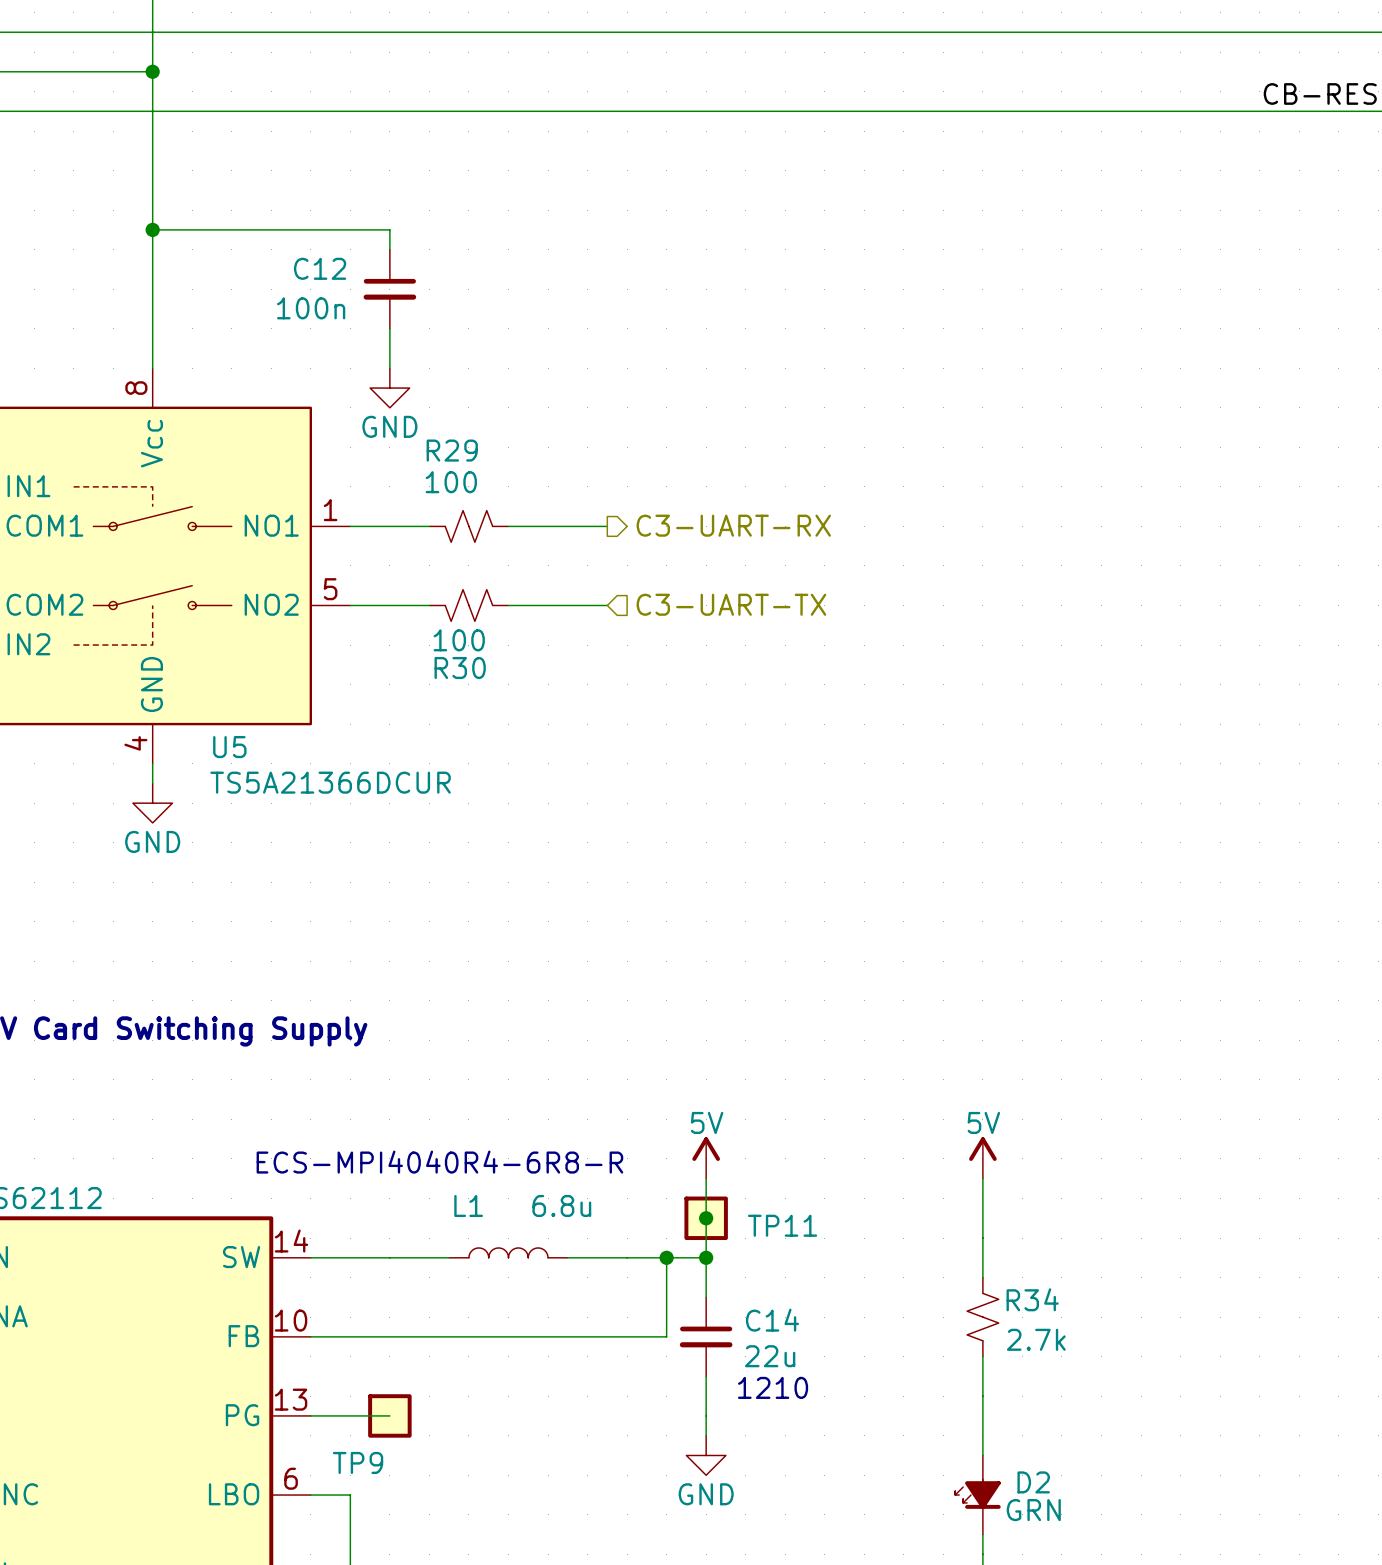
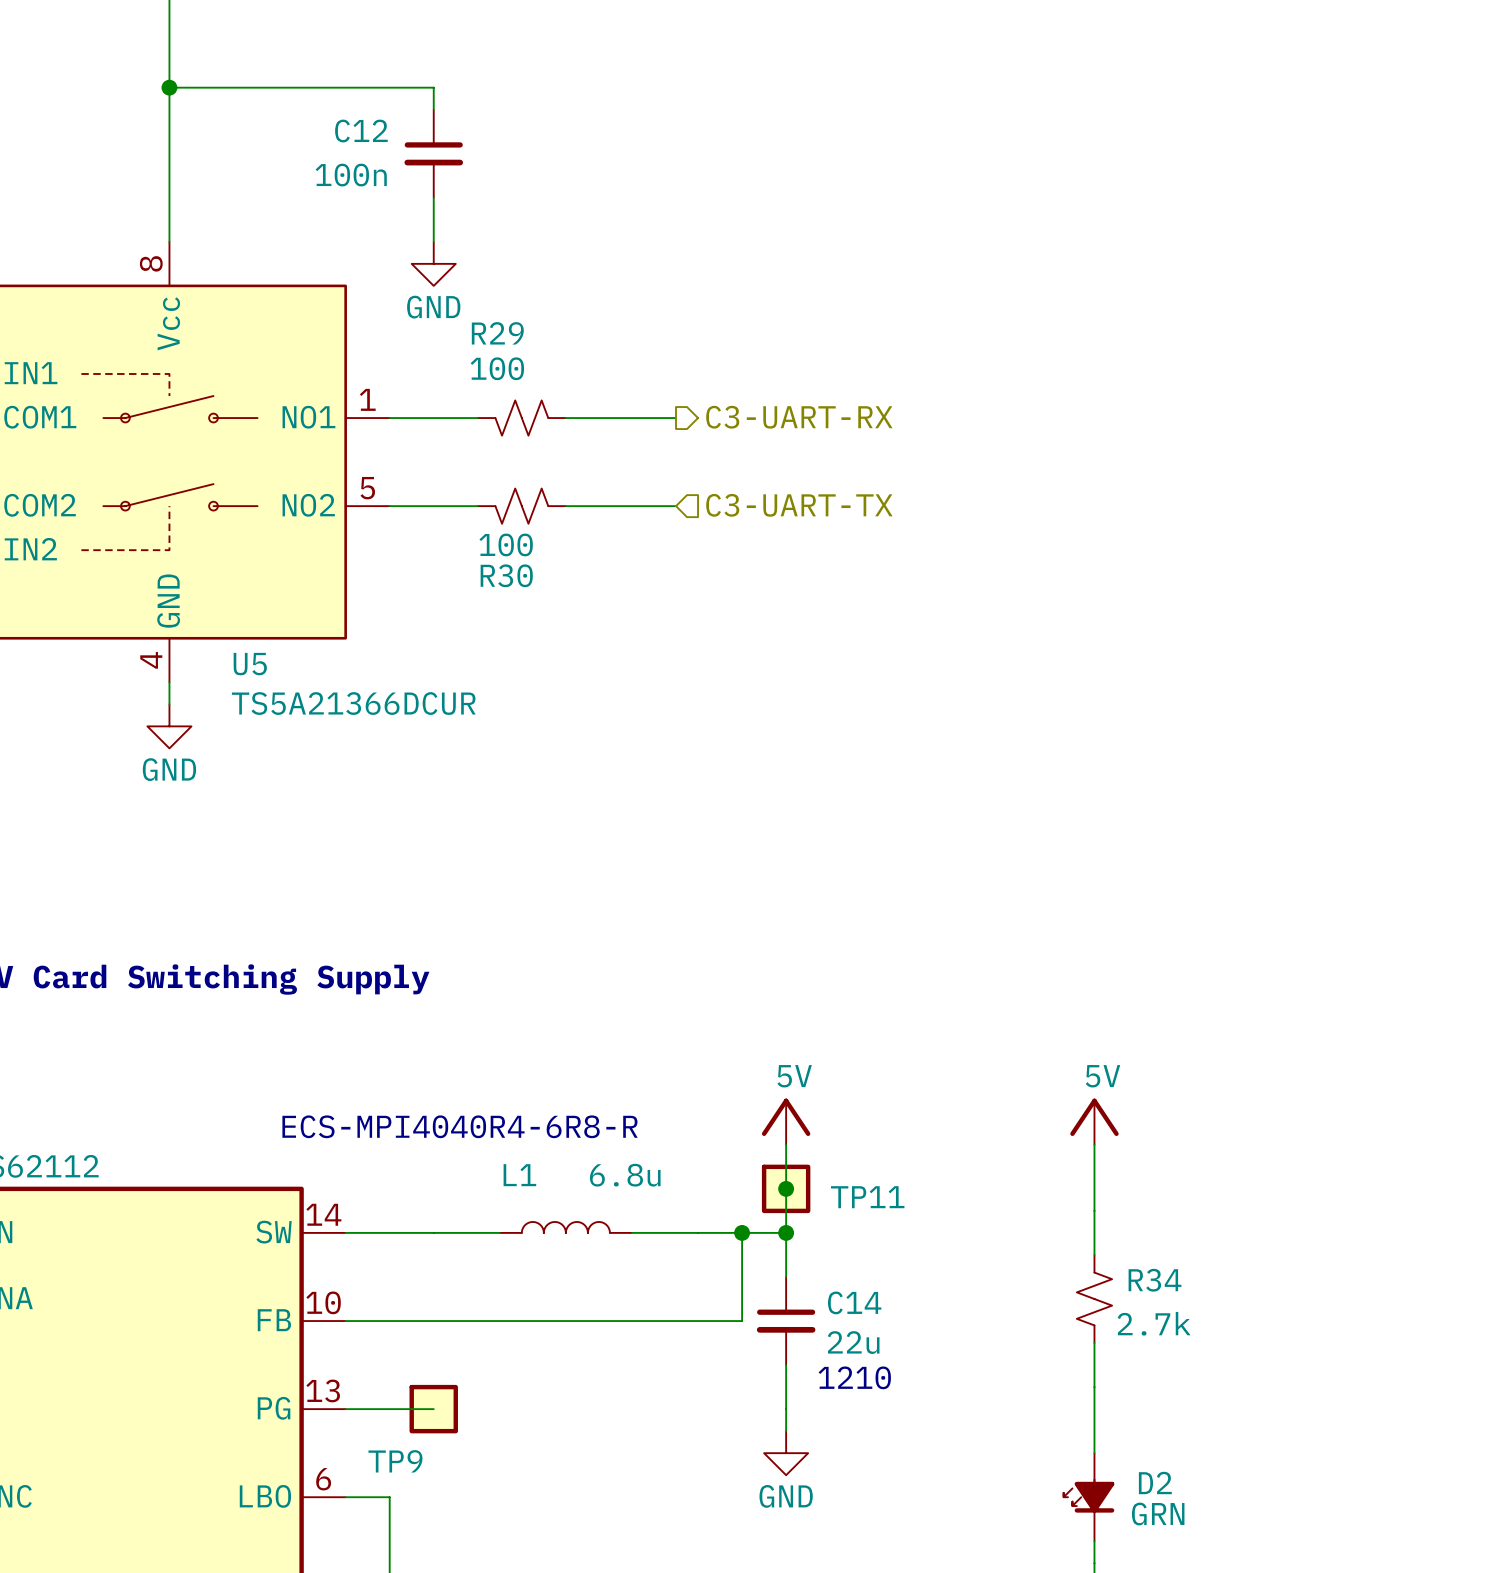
power symbol text position: 5V (707, 1122) -> 5V (794, 1076)
power symbol text position: 5V (983, 1122) -> 5V (1102, 1076)
power symbol shape: [692, 1137, 721, 1179] -> [761, 1098, 811, 1145]
power symbol shape: [969, 1137, 997, 1179] -> [1070, 1098, 1119, 1145]

